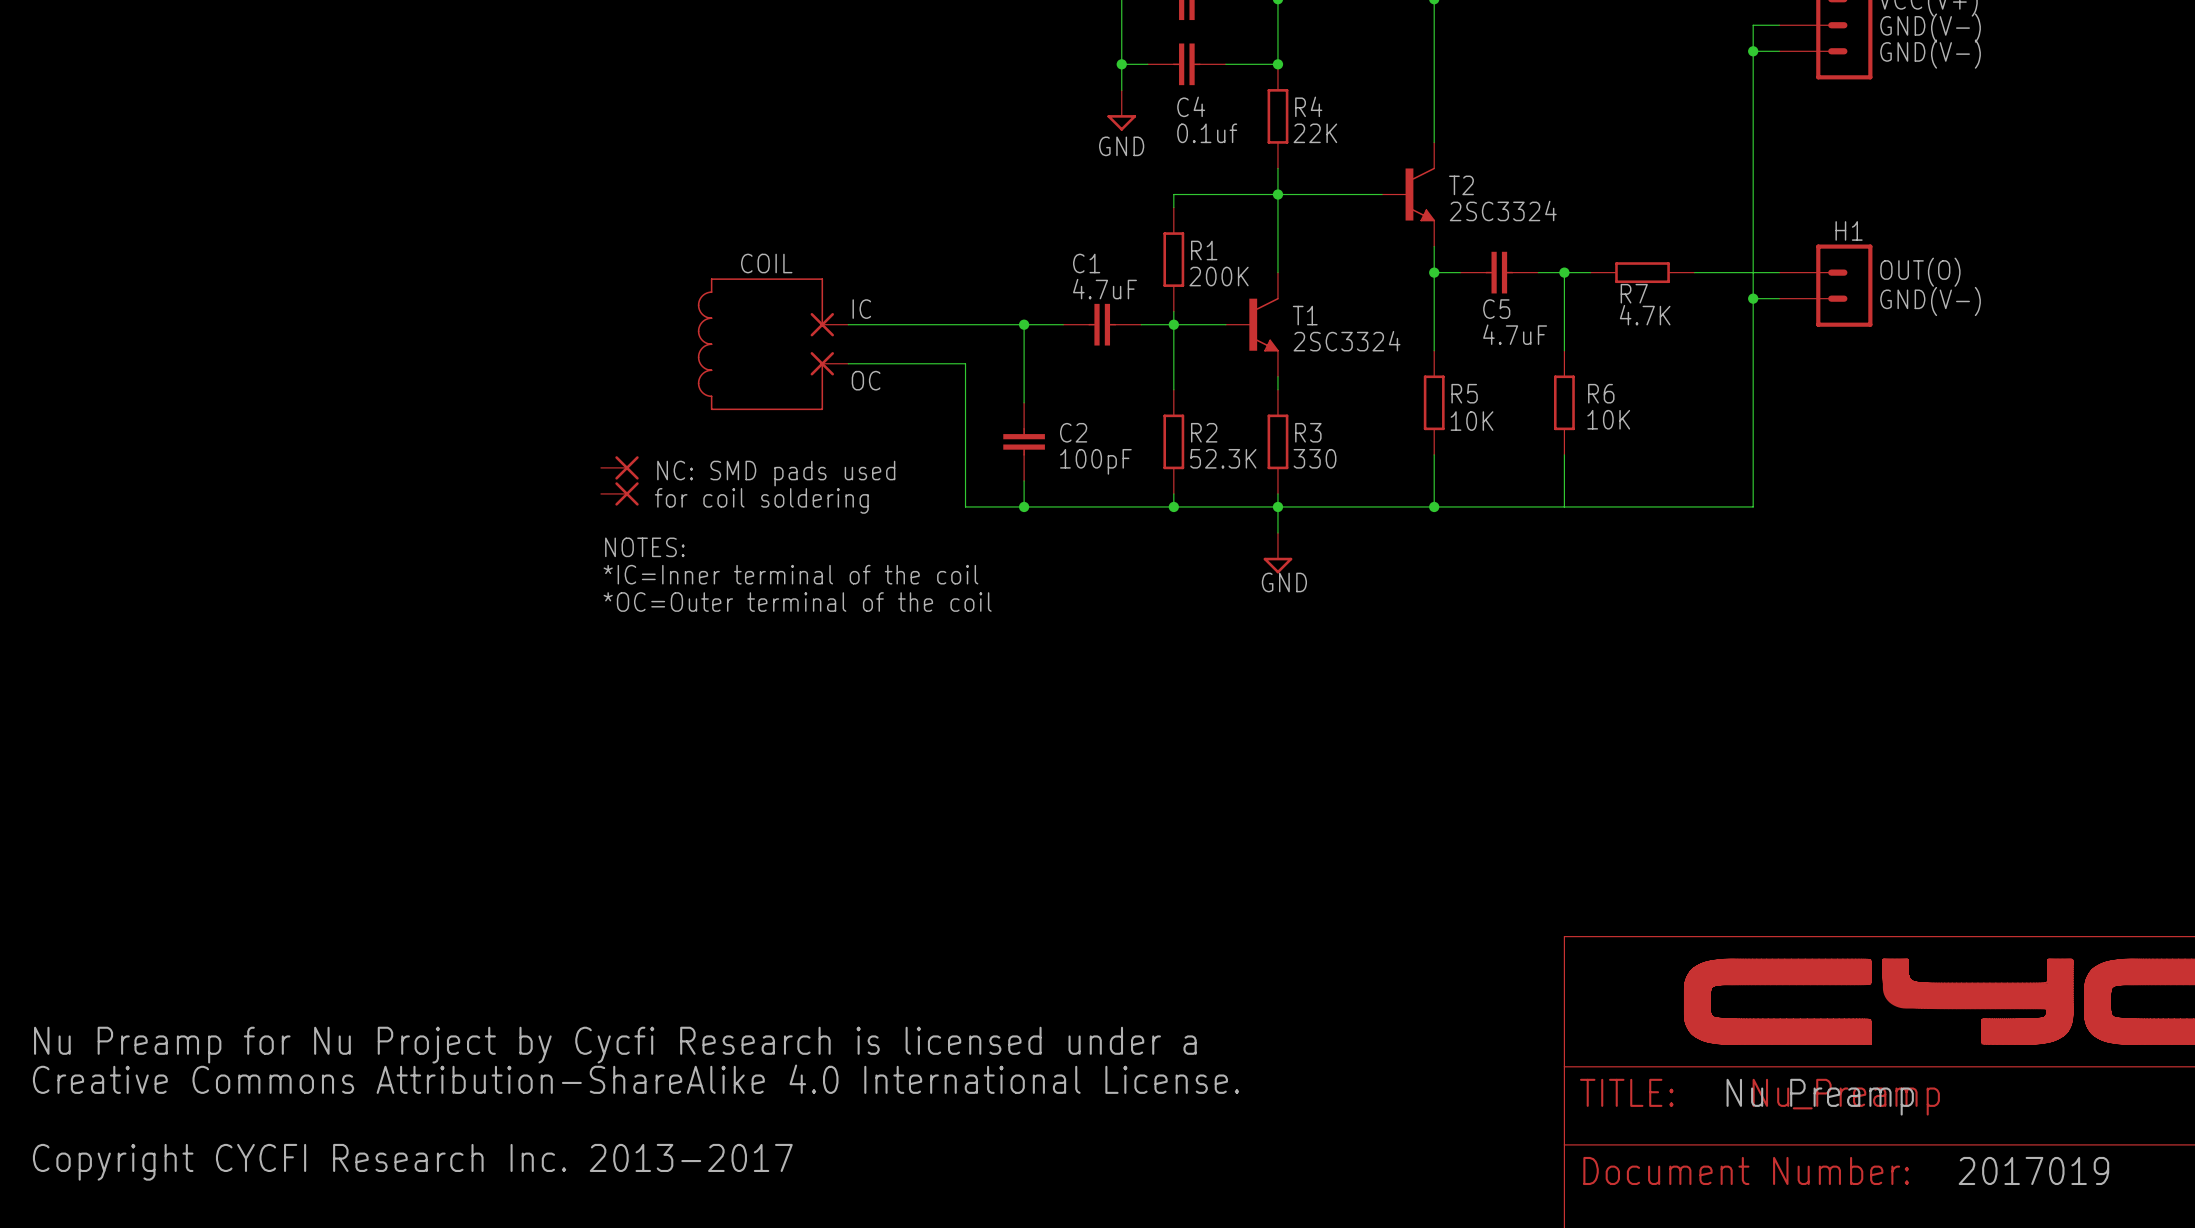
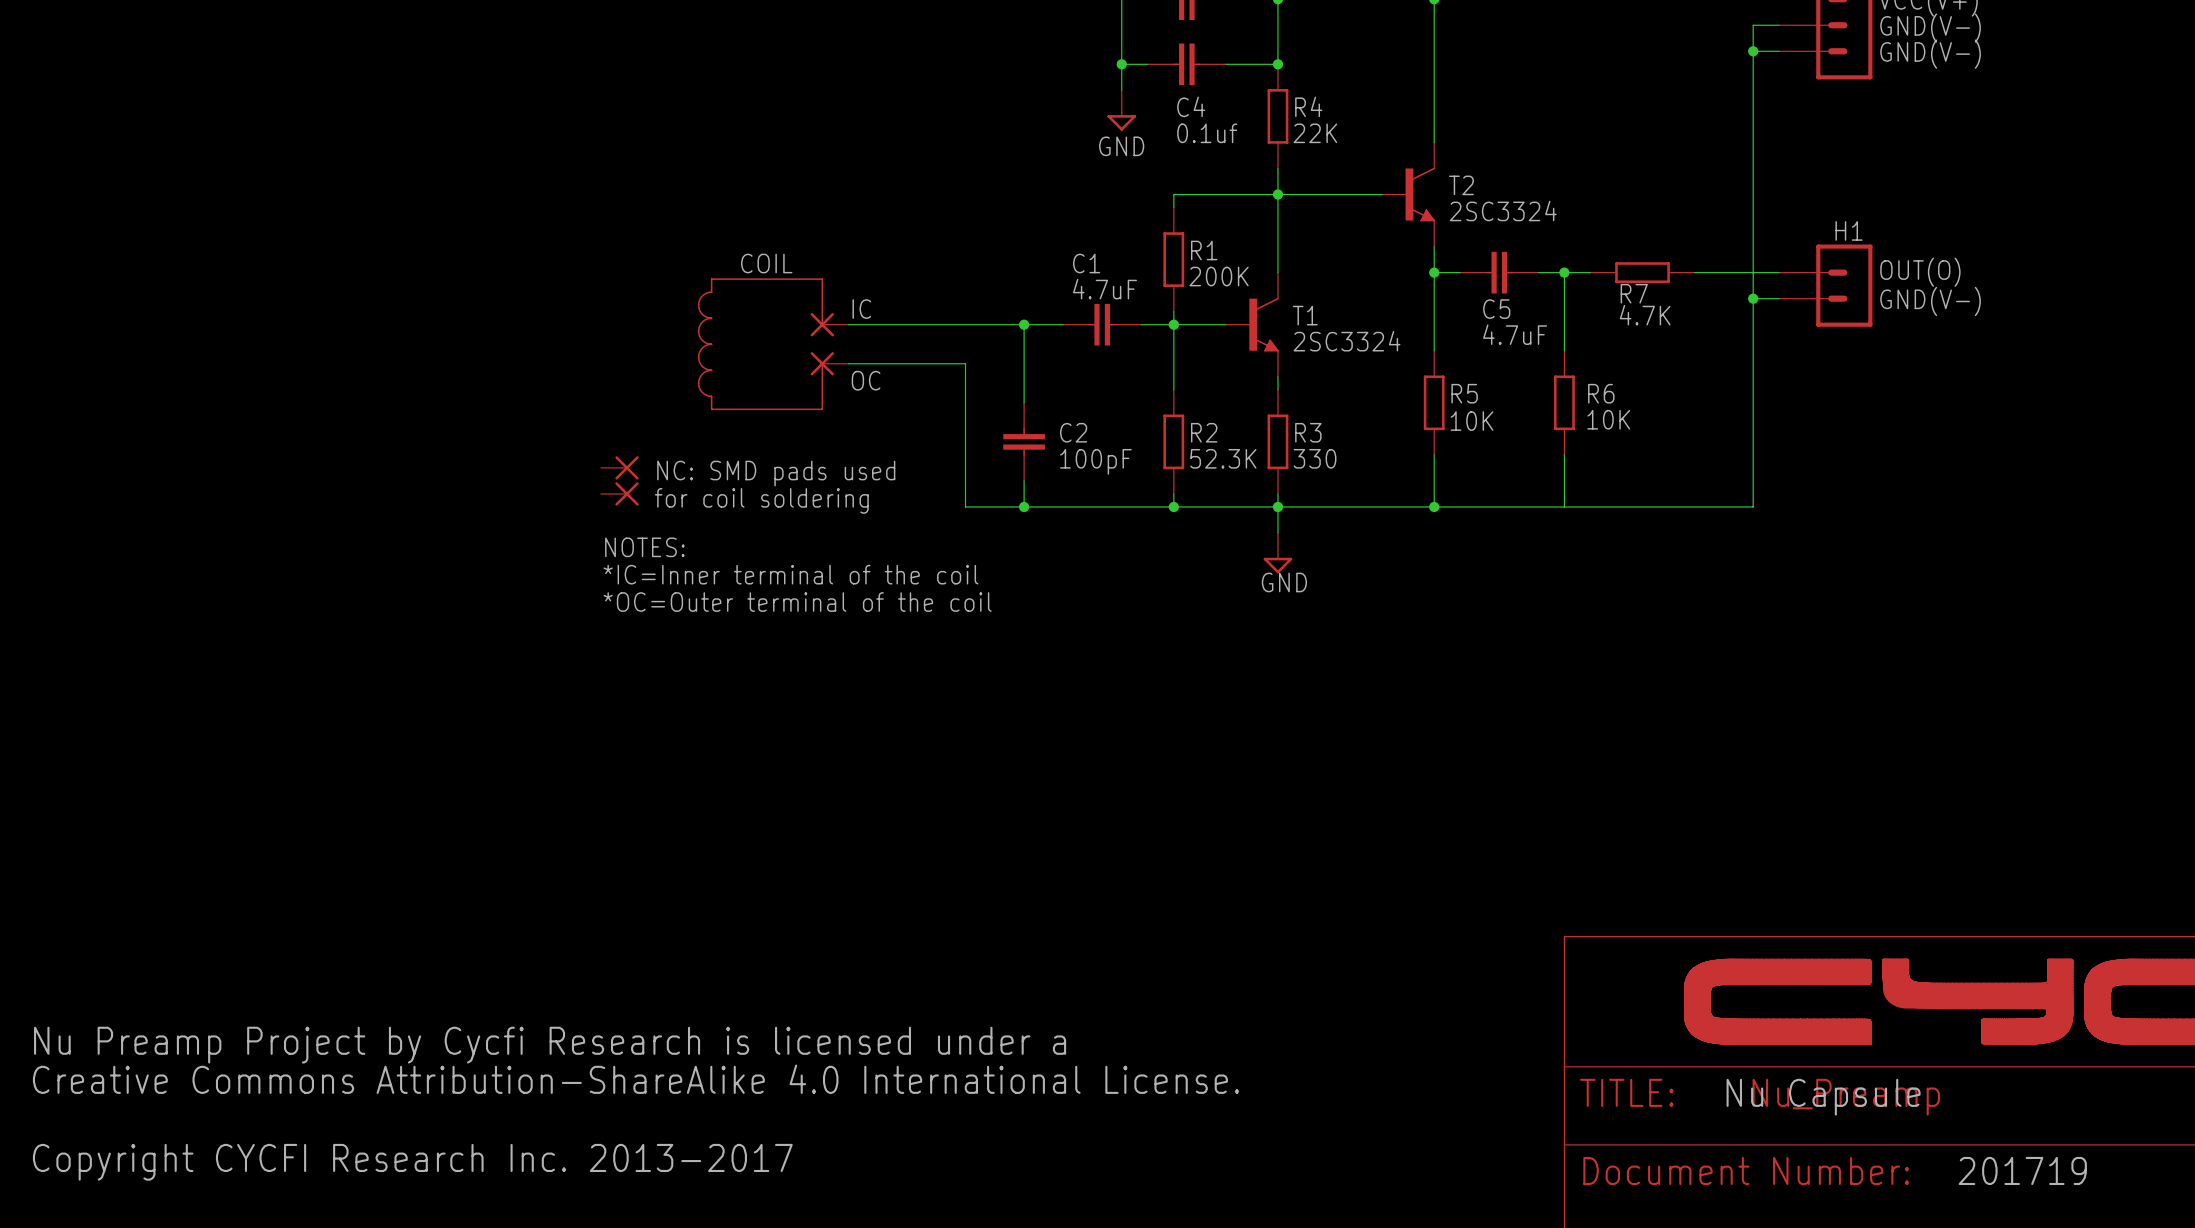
text: Nu Preamp for Nu Project by Cycfi Research is licensed under a (615, 1045) -> Nu Preamp Project by Cycfi Research is licensed under a (550, 1045)
text: Nu Preamp (1820, 1097) -> Nu Capsule (1823, 1097)
text: 2017019 (2033, 1170) -> 201719 (2022, 1170)

